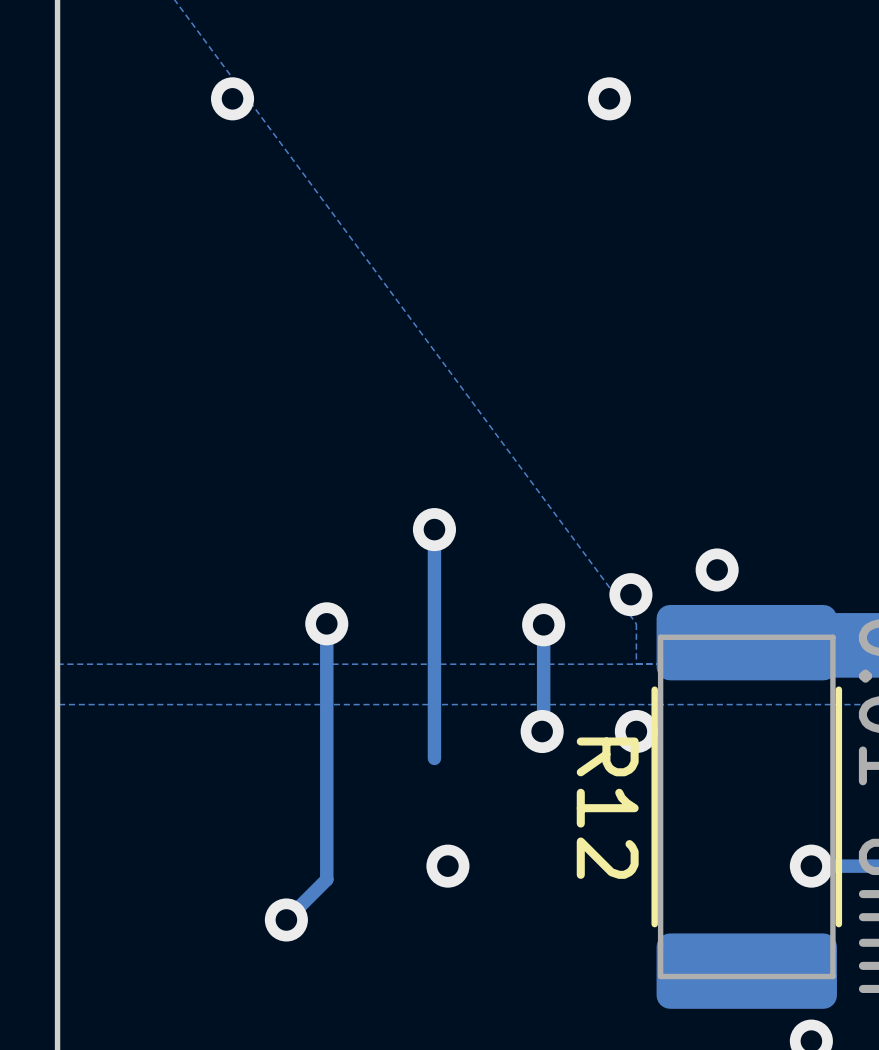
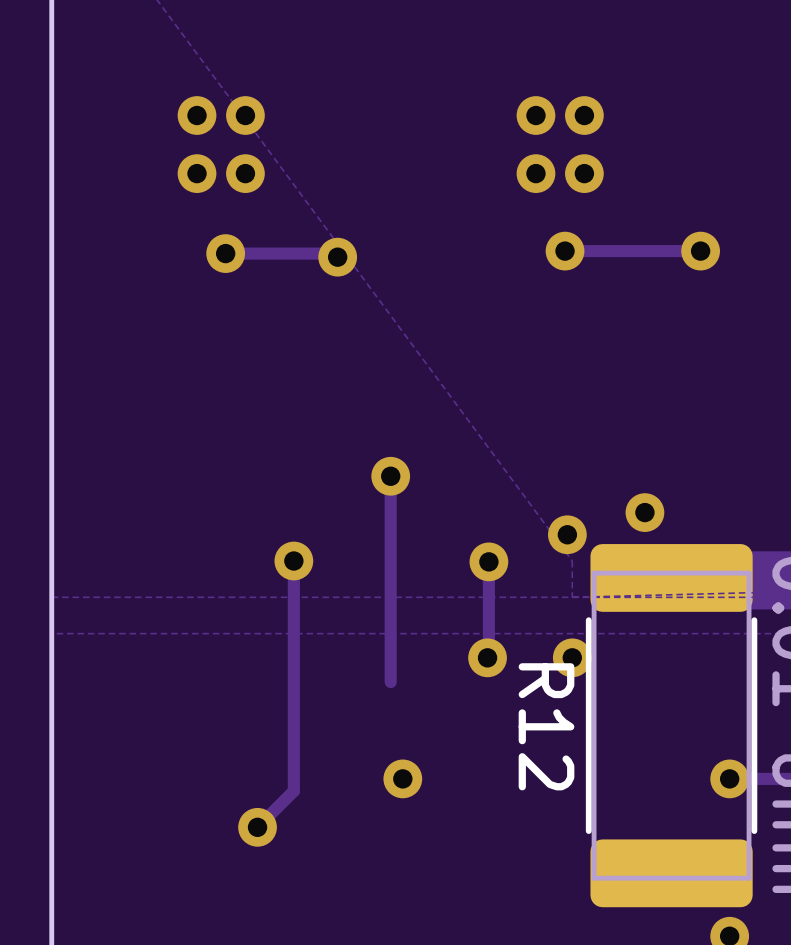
via: (232, 98) -> none
via: (609, 98) -> none
via: none -> (197, 115)
via: none -> (245, 115)
via: none -> (535, 115)
via: none -> (584, 115)
via: none -> (197, 173)
via: none -> (245, 173)
via: none -> (535, 173)
via: none -> (584, 173)
via: none -> (565, 251)
track: none -> (700, 251) (565, 251)
via: none -> (700, 251)
track: none -> (225, 253) (334, 253) (337, 257)
via: none -> (225, 253)
via: none -> (337, 257)

